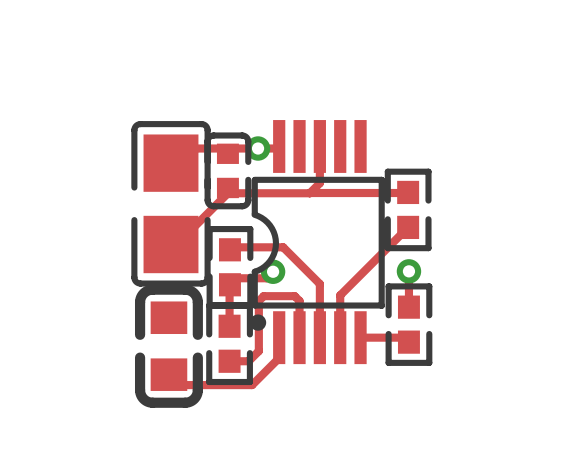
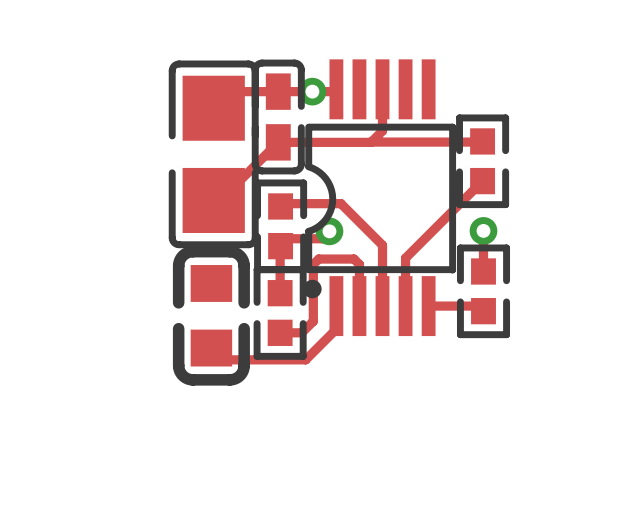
part footprint: [204, 132, 252, 210] -> [251, 59, 305, 175]

